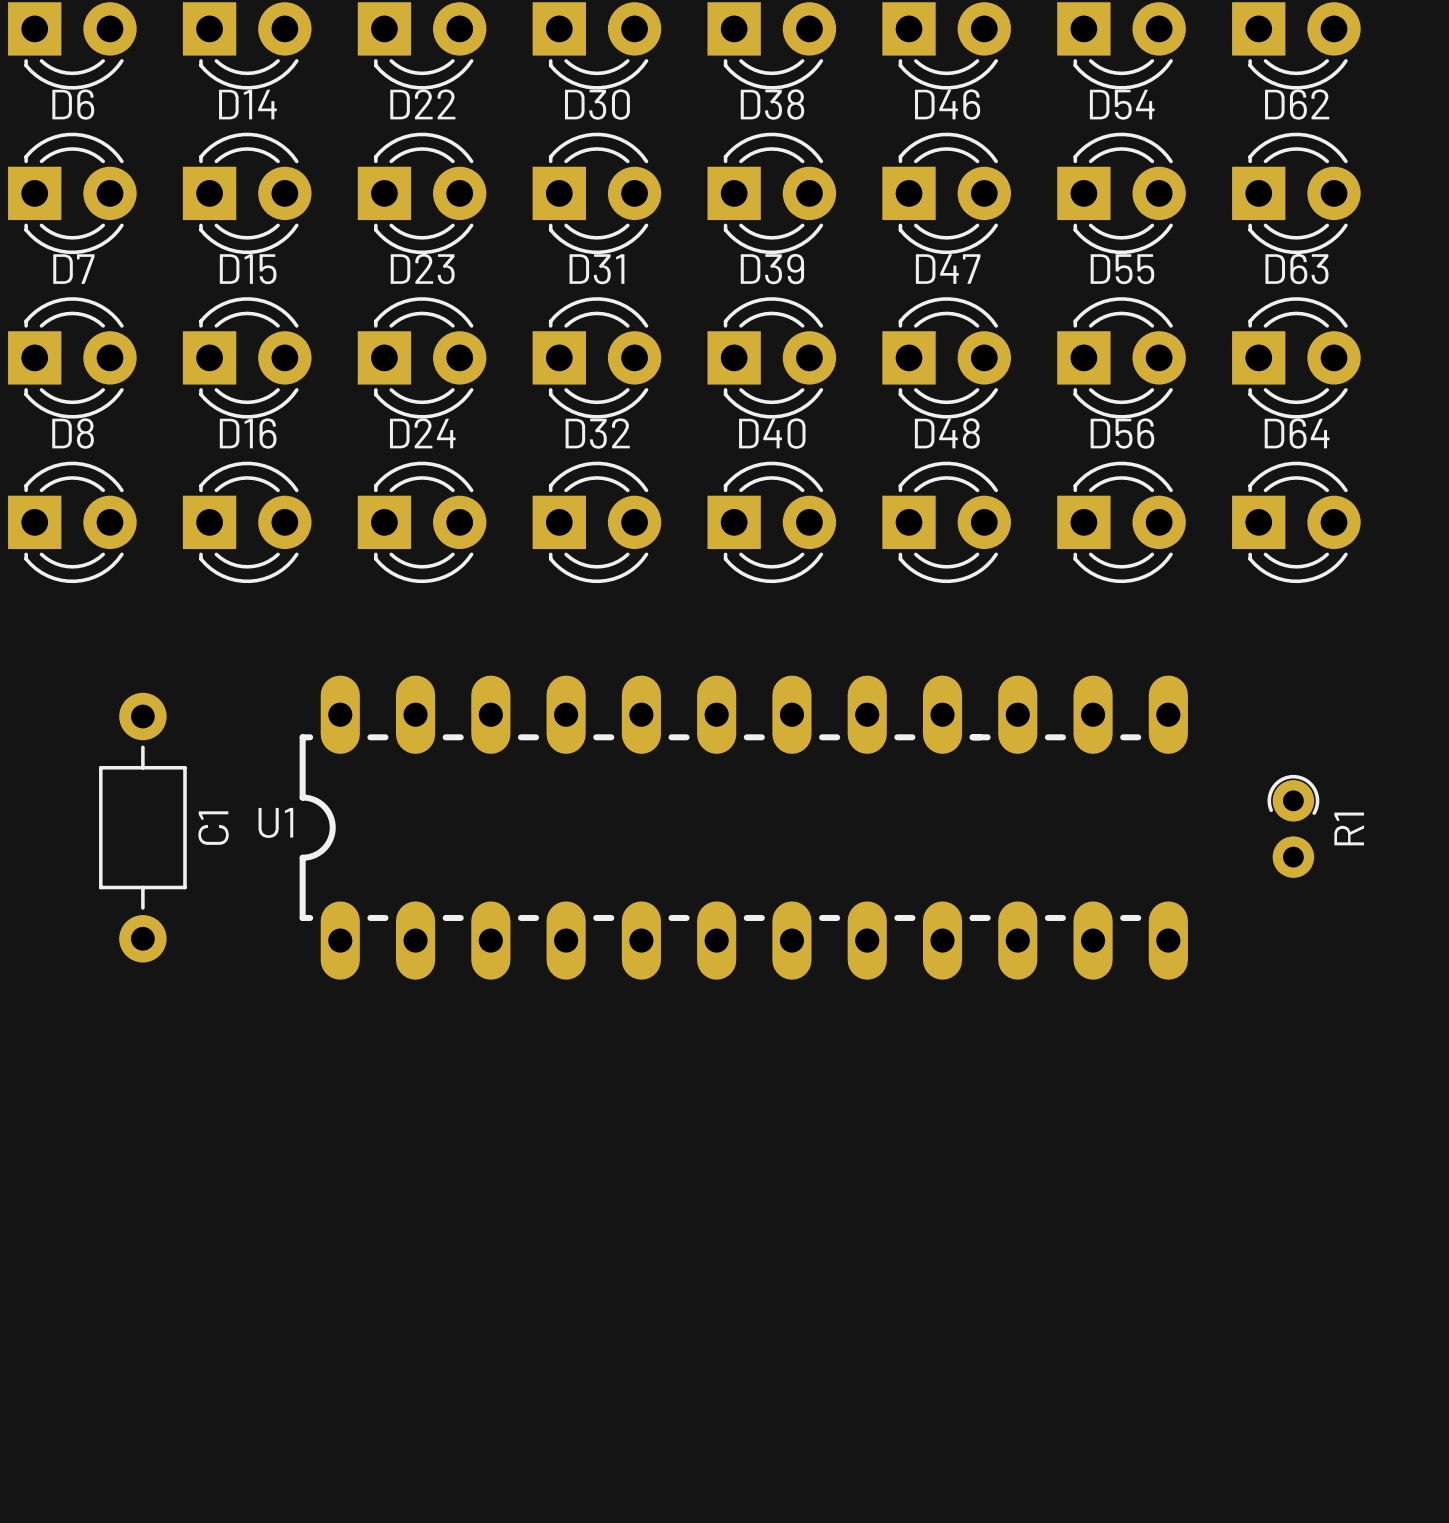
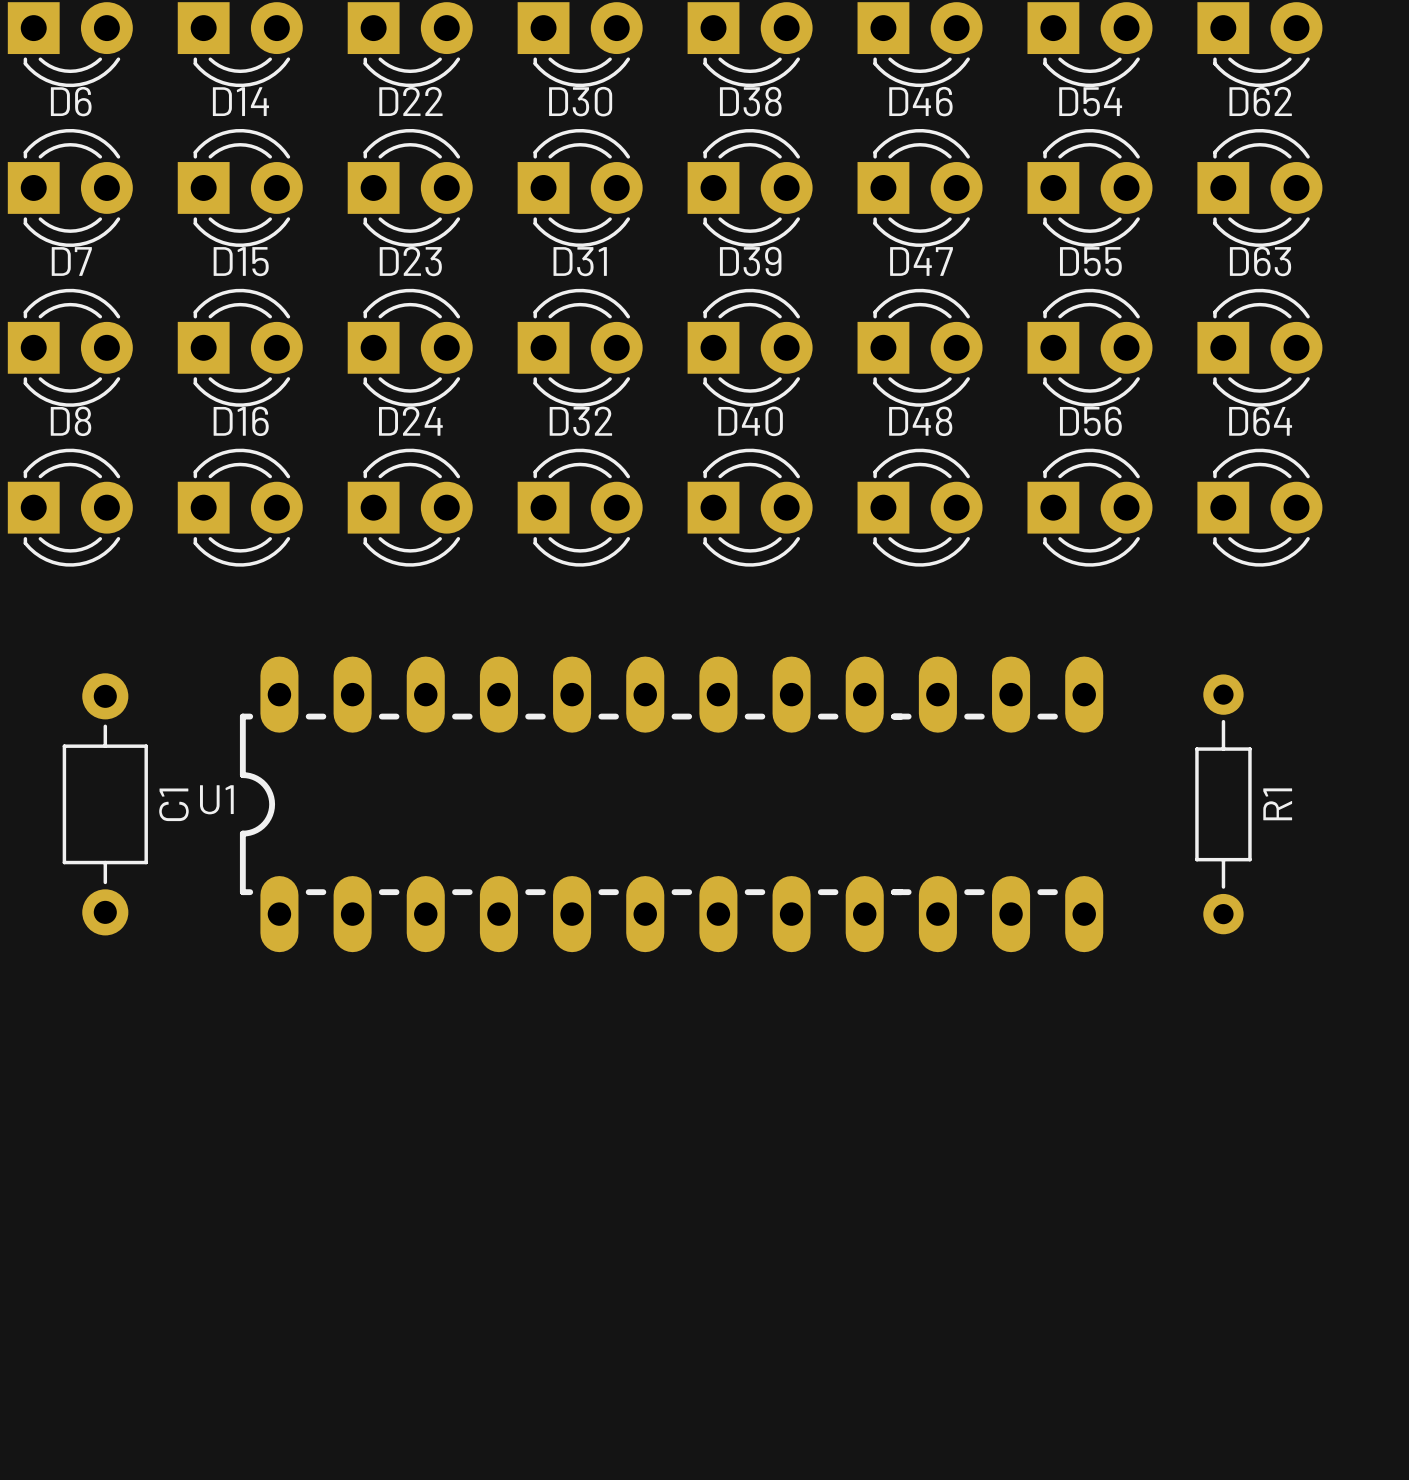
R1 footprint: [1267, 774, 1320, 878] -> [1195, 674, 1252, 935]
C1 position: (142, 827) -> (105, 804)
U1 position: (743, 827) -> (671, 804)

